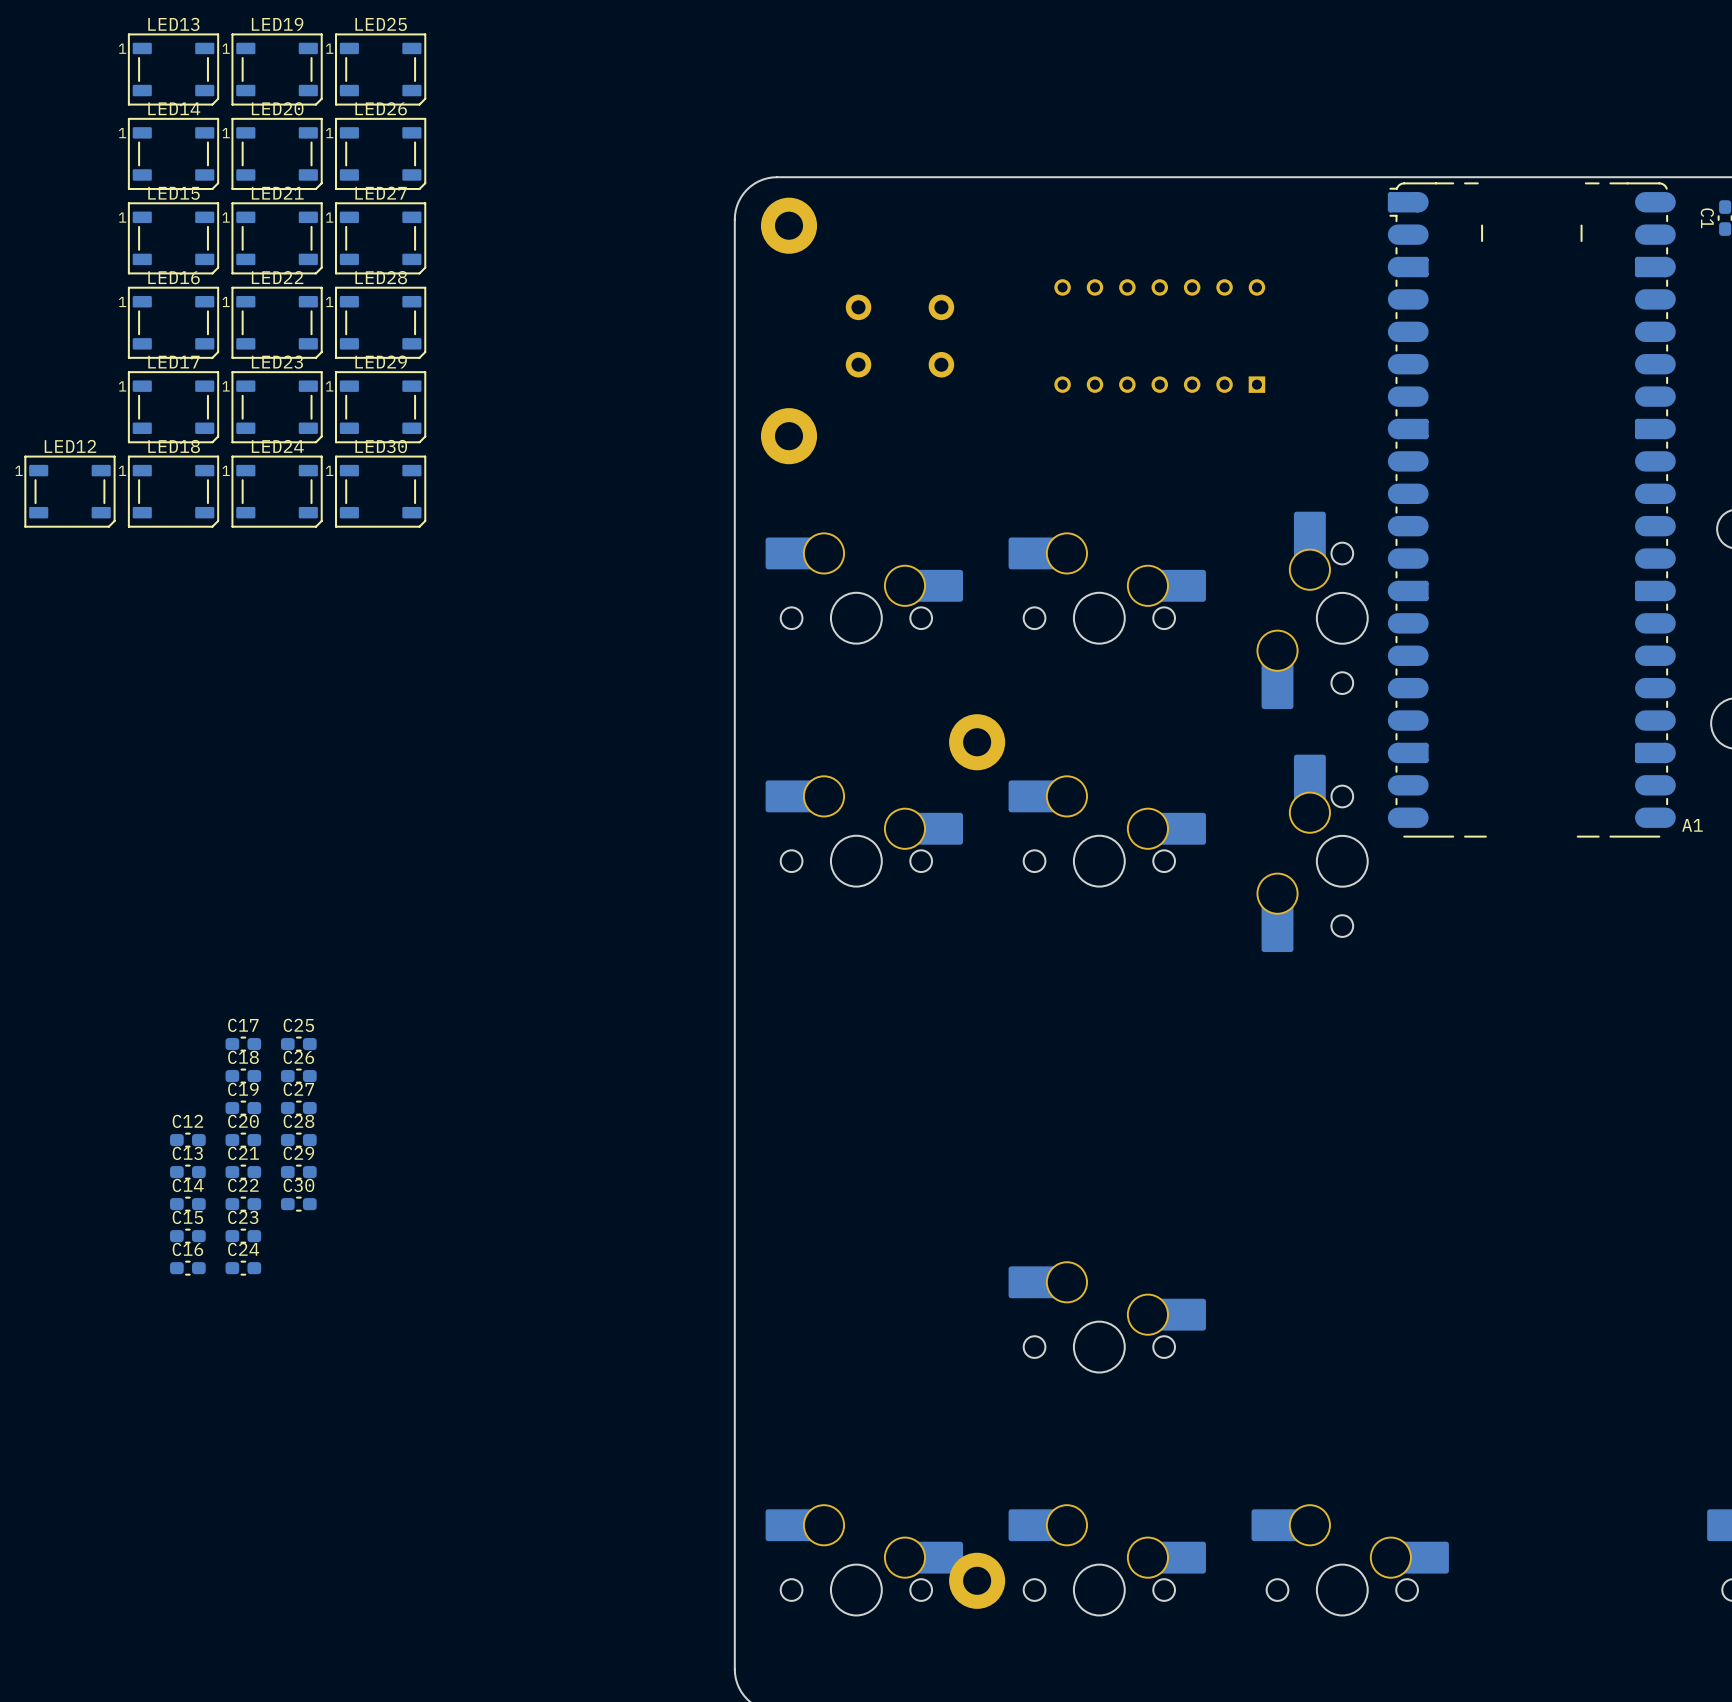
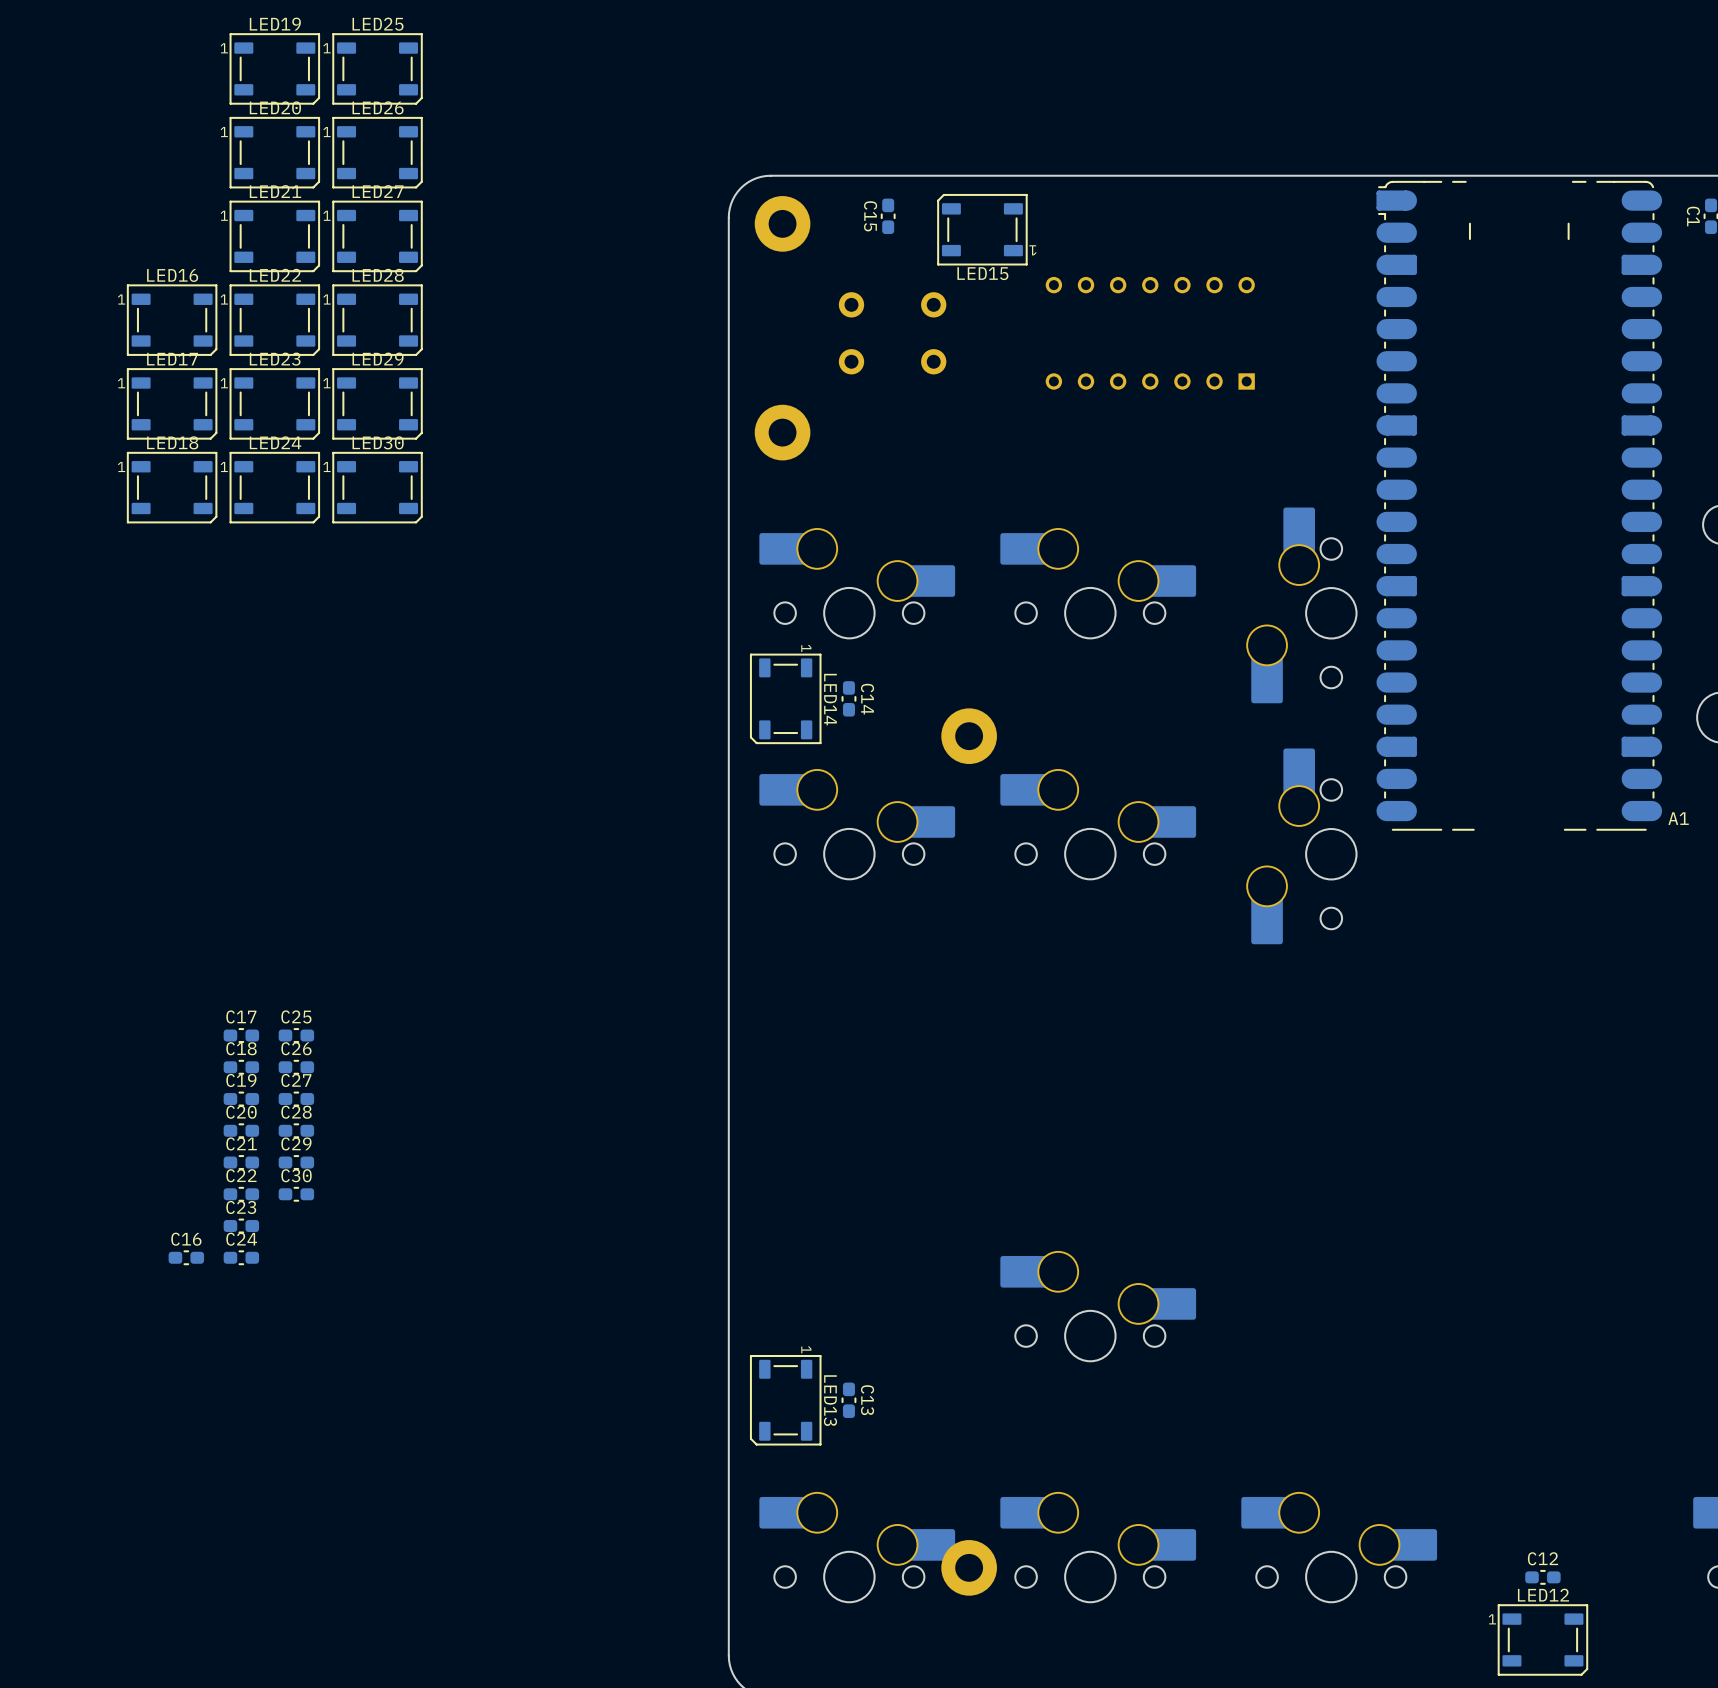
LED13 rotation: 0° (173, 69) -> 90° clockwise (785, 1400)
LED13 position: (173, 69) -> (785, 1400)
LED14 rotation: 0° (173, 153) -> 90° clockwise (785, 698)
LED14 position: (173, 153) -> (785, 698)
LED15 rotation: 0° (173, 238) -> 180° (982, 229)
LED15 position: (173, 238) -> (982, 229)
LED12 position: (69, 491) -> (1542, 1639)
C12 position: (187, 1140) -> (1542, 1577)
C13 rotation: 0° (187, 1172) -> 90° clockwise (848, 1400)
C13 position: (187, 1172) -> (848, 1400)
C14 rotation: 0° (187, 1204) -> 90° clockwise (848, 698)
C14 position: (187, 1204) -> (848, 698)
C15 name position: C15 (187, 1217) -> C15 (870, 216)
C15 rotation: 0° (187, 1236) -> 90° clockwise (888, 216)
C15 position: (187, 1236) -> (888, 216)

